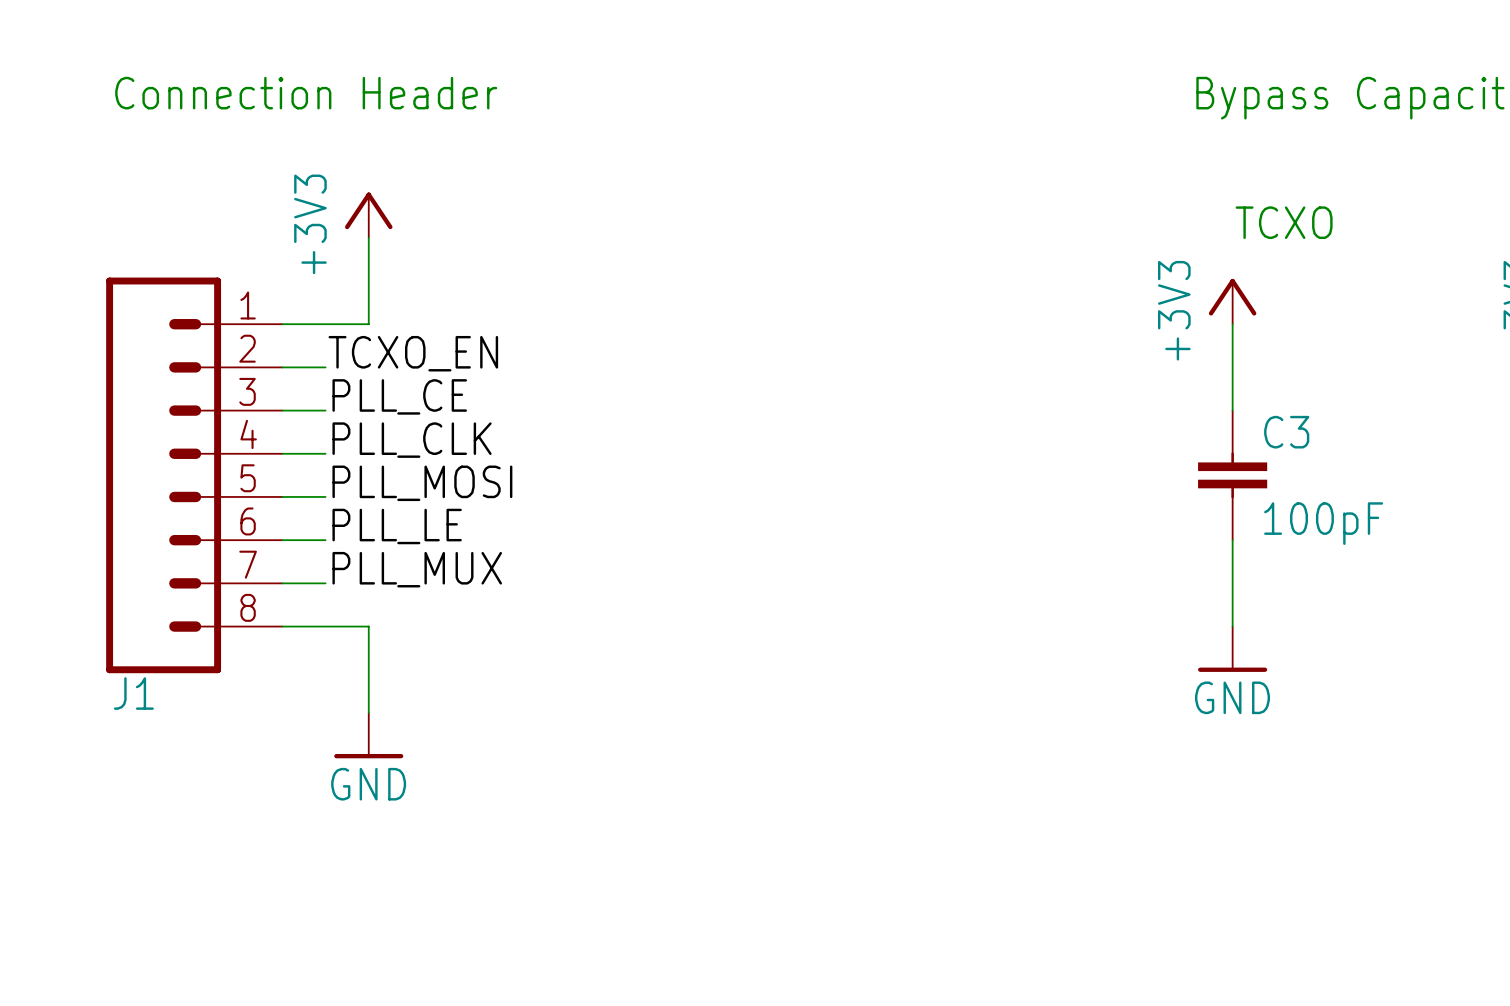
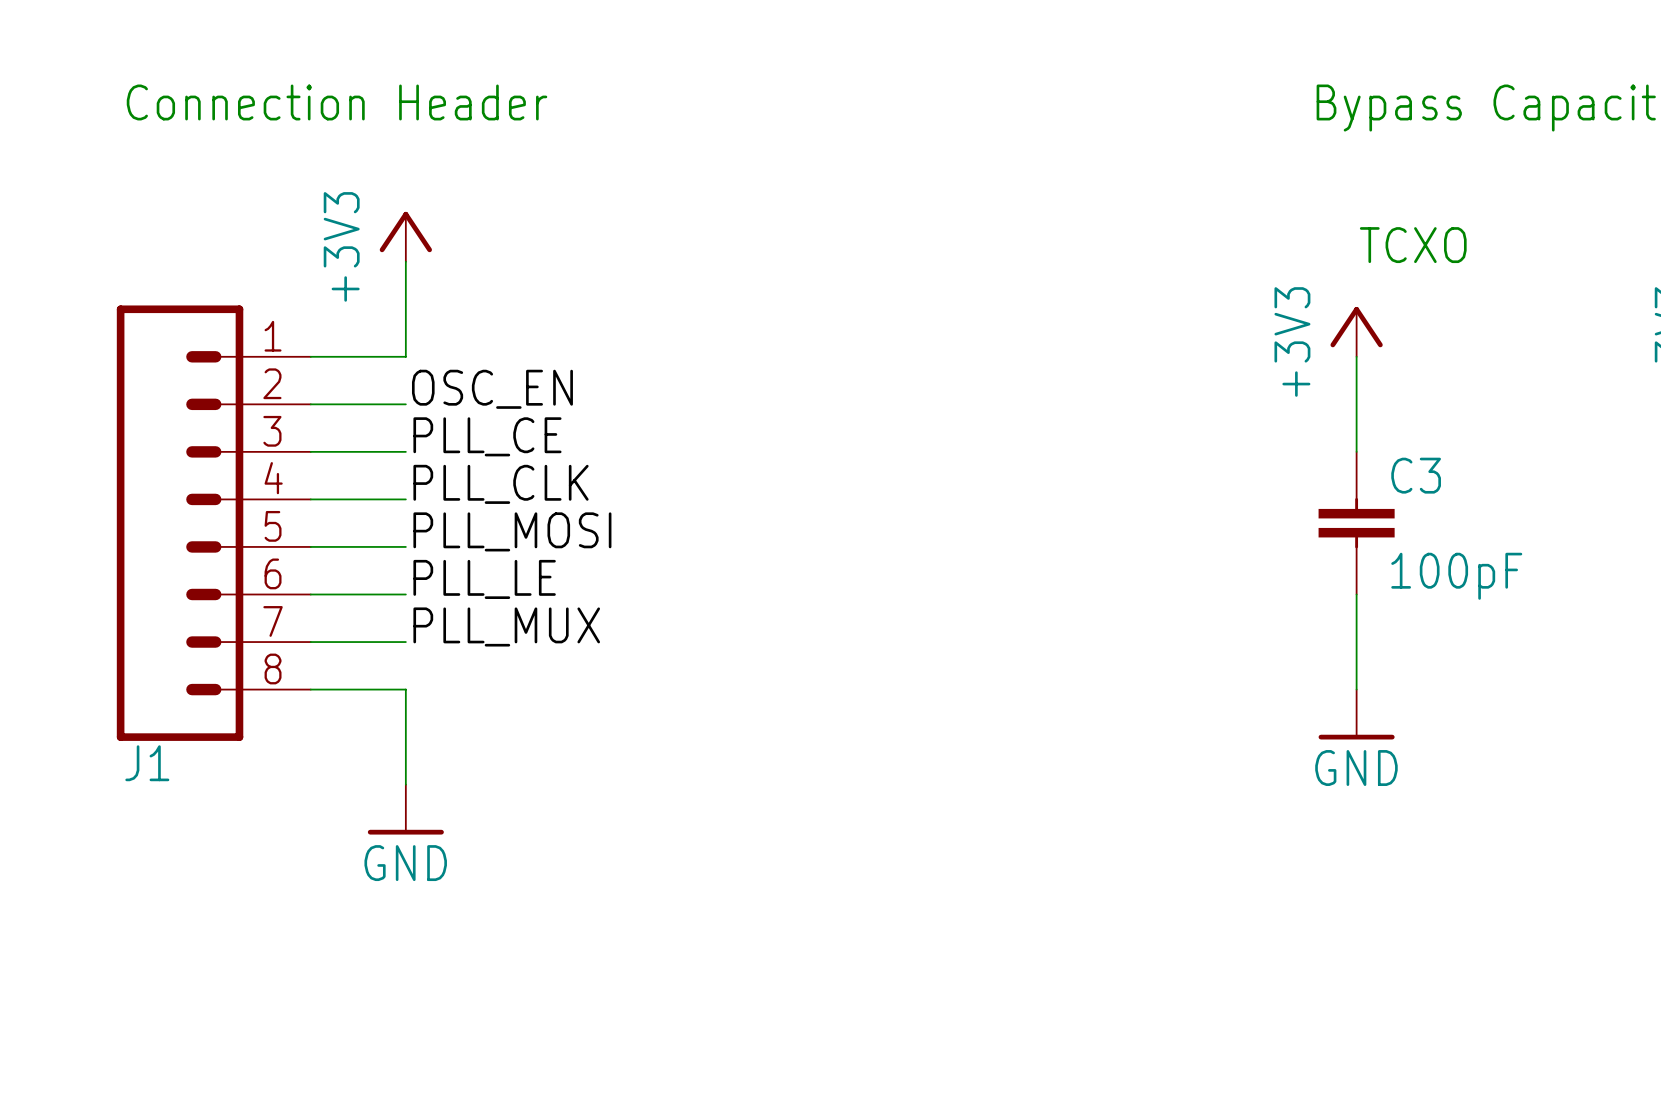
label: TCXO_EN (413, 353) -> OSC_EN (492, 389)
wire: none -> (358, 404) (405, 404)
label position: PLL_CE (399, 396) -> PLL_CE (487, 436)
wire: none -> (358, 451) (405, 451)
label position: PLL_CLK (412, 440) -> PLL_CLK (501, 484)
wire: none -> (358, 499) (405, 499)
label position: PLL_MOSI (422, 483) -> PLL_MOSI (512, 531)
wire: none -> (358, 546) (405, 546)
label position: PLL_LE (397, 526) -> PLL_LE (484, 579)
wire: none -> (358, 594) (405, 594)
label position: PLL_MUX (417, 569) -> PLL_MUX (506, 626)
wire: none -> (358, 642) (405, 642)

